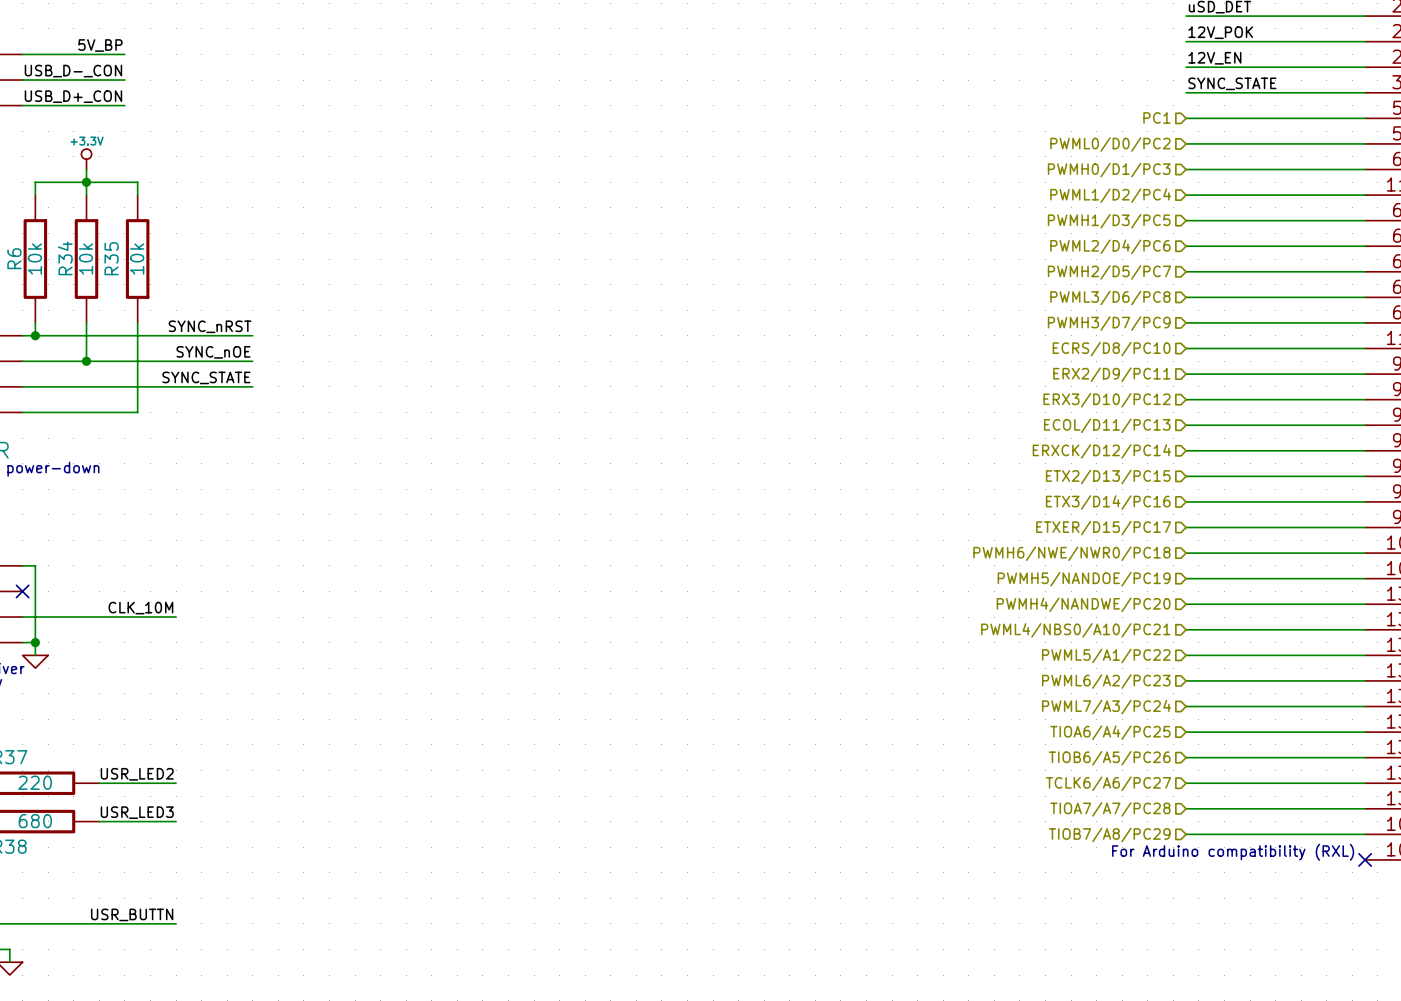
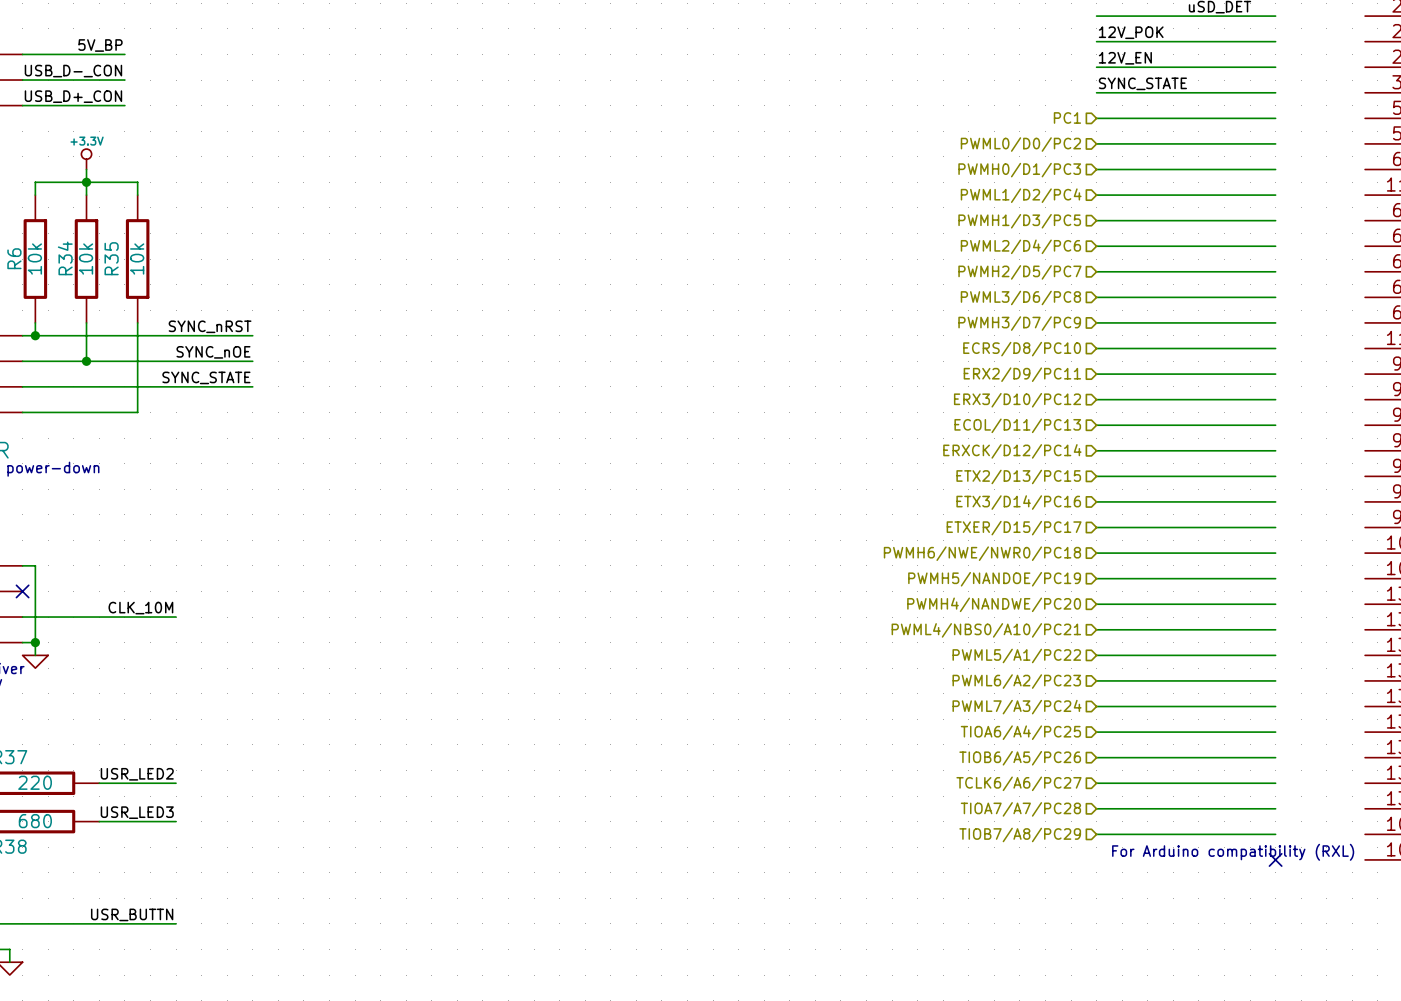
wire: (1275, 16) (1365, 16) -> (1096, 16) (1186, 16)
label position: 12V_POK (1220, 32) -> 12V_POK (1131, 32)
wire: (1275, 41) (1365, 41) -> (1096, 41) (1186, 41)
label position: 12V_EN (1214, 58) -> 12V_EN (1125, 58)
wire: (1275, 67) (1365, 67) -> (1096, 67) (1186, 67)
label position: SYNC_STATE (1232, 83) -> SYNC_STATE (1142, 83)
wire: (1275, 92) (1365, 92) -> (1096, 92) (1186, 92)
hierarchical label position: PC1 (1156, 117) -> PC1 (1067, 117)
wire: (1275, 118) (1365, 118) -> (1096, 118) (1186, 118)
wire: (1275, 143) (1365, 143) -> (1096, 143) (1186, 143)
hierarchical label position: PWML0/D0/PC2 (1110, 144) -> PWML0/D0/PC2 (1020, 144)
wire: (1275, 169) (1365, 169) -> (1096, 169) (1186, 169)
hierarchical label position: PWMH0/D1/PC3 (1109, 170) -> PWMH0/D1/PC3 (1019, 170)
hierarchical label position: PWML1/D2/PC4 (1110, 195) -> PWML1/D2/PC4 (1021, 195)
wire: (1275, 195) (1365, 195) -> (1096, 195) (1186, 195)
wire: (1275, 220) (1365, 220) -> (1096, 220) (1186, 220)
hierarchical label position: PWMH1/D3/PC5 (1109, 221) -> PWMH1/D3/PC5 (1019, 221)
hierarchical label position: PWML2/D4/PC6 (1110, 246) -> PWML2/D4/PC6 (1020, 246)
wire: (1275, 246) (1365, 246) -> (1096, 246) (1186, 246)
wire: (1275, 271) (1365, 271) -> (1096, 271) (1186, 271)
hierarchical label position: PWMH2/D5/PC7 (1109, 272) -> PWMH2/D5/PC7 (1019, 272)
hierarchical label position: PWML3/D6/PC8 (1110, 297) -> PWML3/D6/PC8 (1020, 297)
wire: (1275, 297) (1365, 297) -> (1096, 297) (1186, 297)
wire: (1275, 322) (1365, 322) -> (1096, 322) (1186, 322)
hierarchical label position: PWMH3/D7/PC9 (1109, 323) -> PWMH3/D7/PC9 (1019, 323)
wire: (1275, 348) (1365, 348) -> (1096, 348) (1186, 348)
hierarchical label position: ECRS/D8/PC10 (1111, 349) -> ECRS/D8/PC10 (1022, 349)
hierarchical label position: ERX2/D9/PC11 (1111, 374) -> ERX2/D9/PC11 (1022, 374)
wire: (1275, 374) (1365, 374) -> (1096, 374) (1186, 374)
wire: (1275, 399) (1365, 399) -> (1096, 399) (1186, 399)
hierarchical label position: ERX3/D10/PC12 (1107, 400) -> ERX3/D10/PC12 (1017, 400)
hierarchical label position: ECOL/D11/PC13 (1107, 425) -> ECOL/D11/PC13 (1017, 425)
wire: (1275, 425) (1365, 425) -> (1096, 425) (1186, 425)
wire: (1275, 450) (1365, 450) -> (1096, 450) (1186, 450)
hierarchical label position: ERXCK/D12/PC14 (1101, 451) -> ERXCK/D12/PC14 (1012, 451)
hierarchical label position: ETX2/D13/PC15 (1108, 476) -> ETX2/D13/PC15 (1018, 476)
wire: (1275, 476) (1365, 476) -> (1096, 476) (1186, 476)
wire: (1275, 501) (1365, 501) -> (1096, 501) (1186, 501)
hierarchical label position: ETX3/D14/PC16 (1108, 502) -> ETX3/D14/PC16 (1018, 502)
wire: (1275, 527) (1365, 527) -> (1096, 527) (1186, 527)
hierarchical label position: ETXER/D15/PC17 (1103, 528) -> ETXER/D15/PC17 (1014, 528)
hierarchical label position: PWMH6/NWE/NWR0/PC18 (1071, 553) -> PWMH6/NWE/NWR0/PC18 (982, 553)
wire: (1275, 553) (1365, 553) -> (1096, 553) (1186, 553)
wire: (1275, 578) (1365, 578) -> (1096, 578) (1186, 578)
hierarchical label position: PWMH5/NANDOE/PC19 (1084, 579) -> PWMH5/NANDOE/PC19 (994, 579)
hierarchical label position: PWMH4/NANDWE/PC20 (1083, 604) -> PWMH4/NANDWE/PC20 (994, 604)
wire: (1275, 604) (1365, 604) -> (1096, 604) (1186, 604)
wire: (1275, 629) (1365, 629) -> (1096, 629) (1186, 629)
hierarchical label position: PWML4/NBS0/A10/PC21 (1075, 630) -> PWML4/NBS0/A10/PC21 (986, 630)
hierarchical label position: PWML5/A1/PC22 (1106, 655) -> PWML5/A1/PC22 (1016, 655)
wire: (1275, 655) (1365, 655) -> (1096, 655) (1186, 655)
wire: (1275, 680) (1365, 680) -> (1096, 680) (1186, 680)
hierarchical label position: PWML6/A2/PC23 (1106, 681) -> PWML6/A2/PC23 (1016, 681)
wire: (1275, 706) (1365, 706) -> (1096, 706) (1186, 706)
hierarchical label position: PWML7/A3/PC24 (1106, 707) -> PWML7/A3/PC24 (1017, 707)
hierarchical label position: TIOA6/A4/PC25 (1110, 732) -> TIOA6/A4/PC25 (1020, 732)
wire: (1275, 732) (1365, 732) -> (1096, 732) (1186, 732)
wire: (1275, 757) (1365, 757) -> (1096, 757) (1186, 757)
hierarchical label position: TIOB6/A5/PC26 (1109, 758) -> TIOB6/A5/PC26 (1020, 758)
hierarchical label position: TCLK6/A6/PC27 (1108, 783) -> TCLK6/A6/PC27 (1018, 783)
wire: (1275, 783) (1365, 783) -> (1096, 783) (1186, 783)
wire: (1275, 808) (1365, 808) -> (1096, 808) (1186, 808)
hierarchical label position: TIOA7/A7/PC28 (1110, 809) -> TIOA7/A7/PC28 (1020, 809)
hierarchical label position: TIOB7/A8/PC29 (1109, 834) -> TIOB7/A8/PC29 (1020, 834)
wire: (1275, 834) (1365, 834) -> (1096, 834) (1186, 834)
no-connect mark: none -> (1275, 859)
no-connect mark: (1365, 859) -> none

